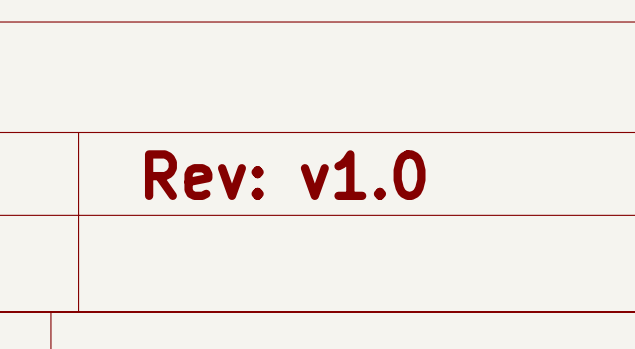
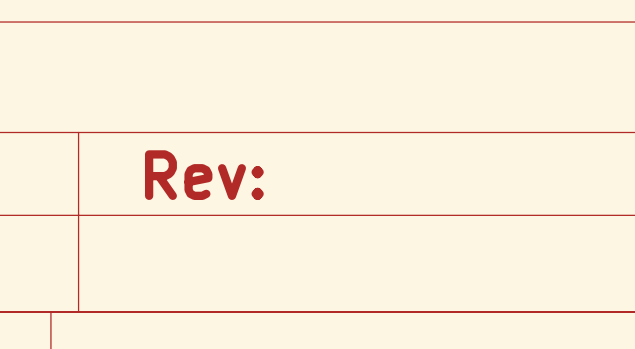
title block: Rev: v1.0 (285, 175) -> Rev: (204, 175)

